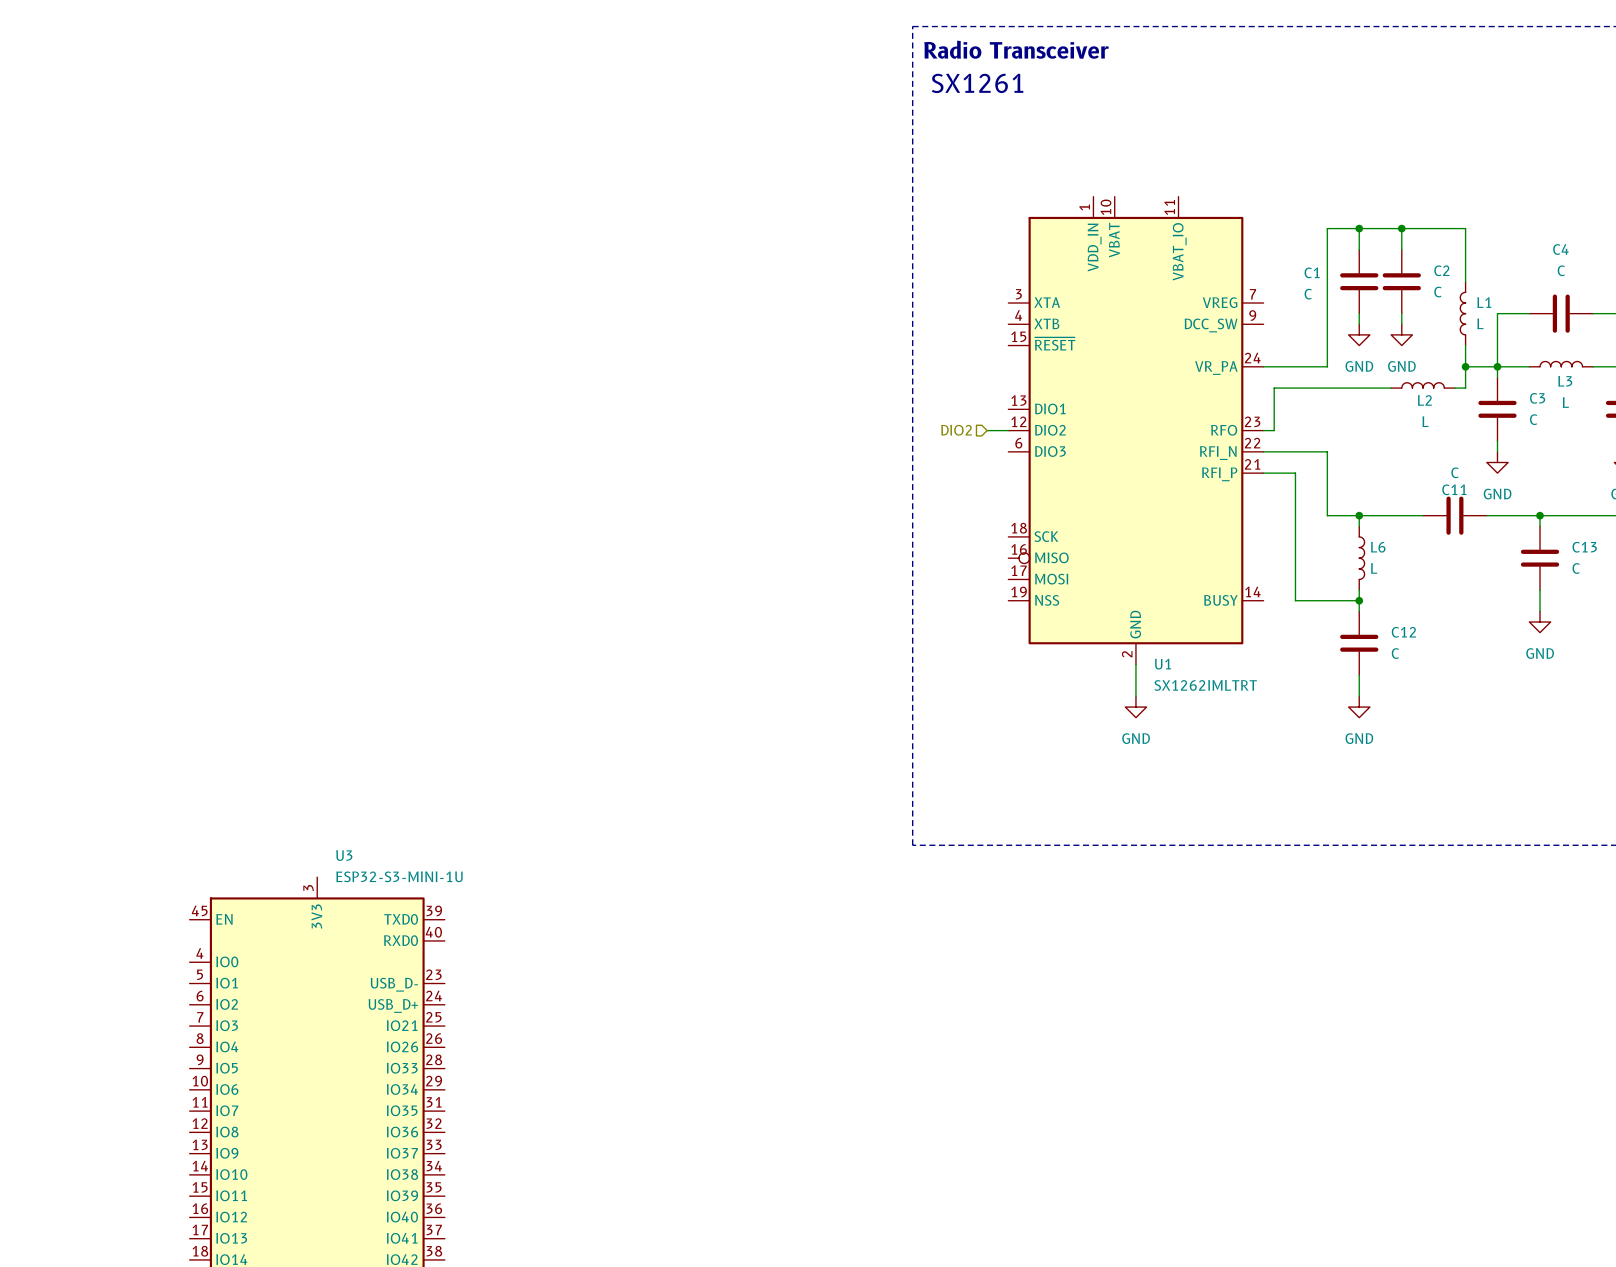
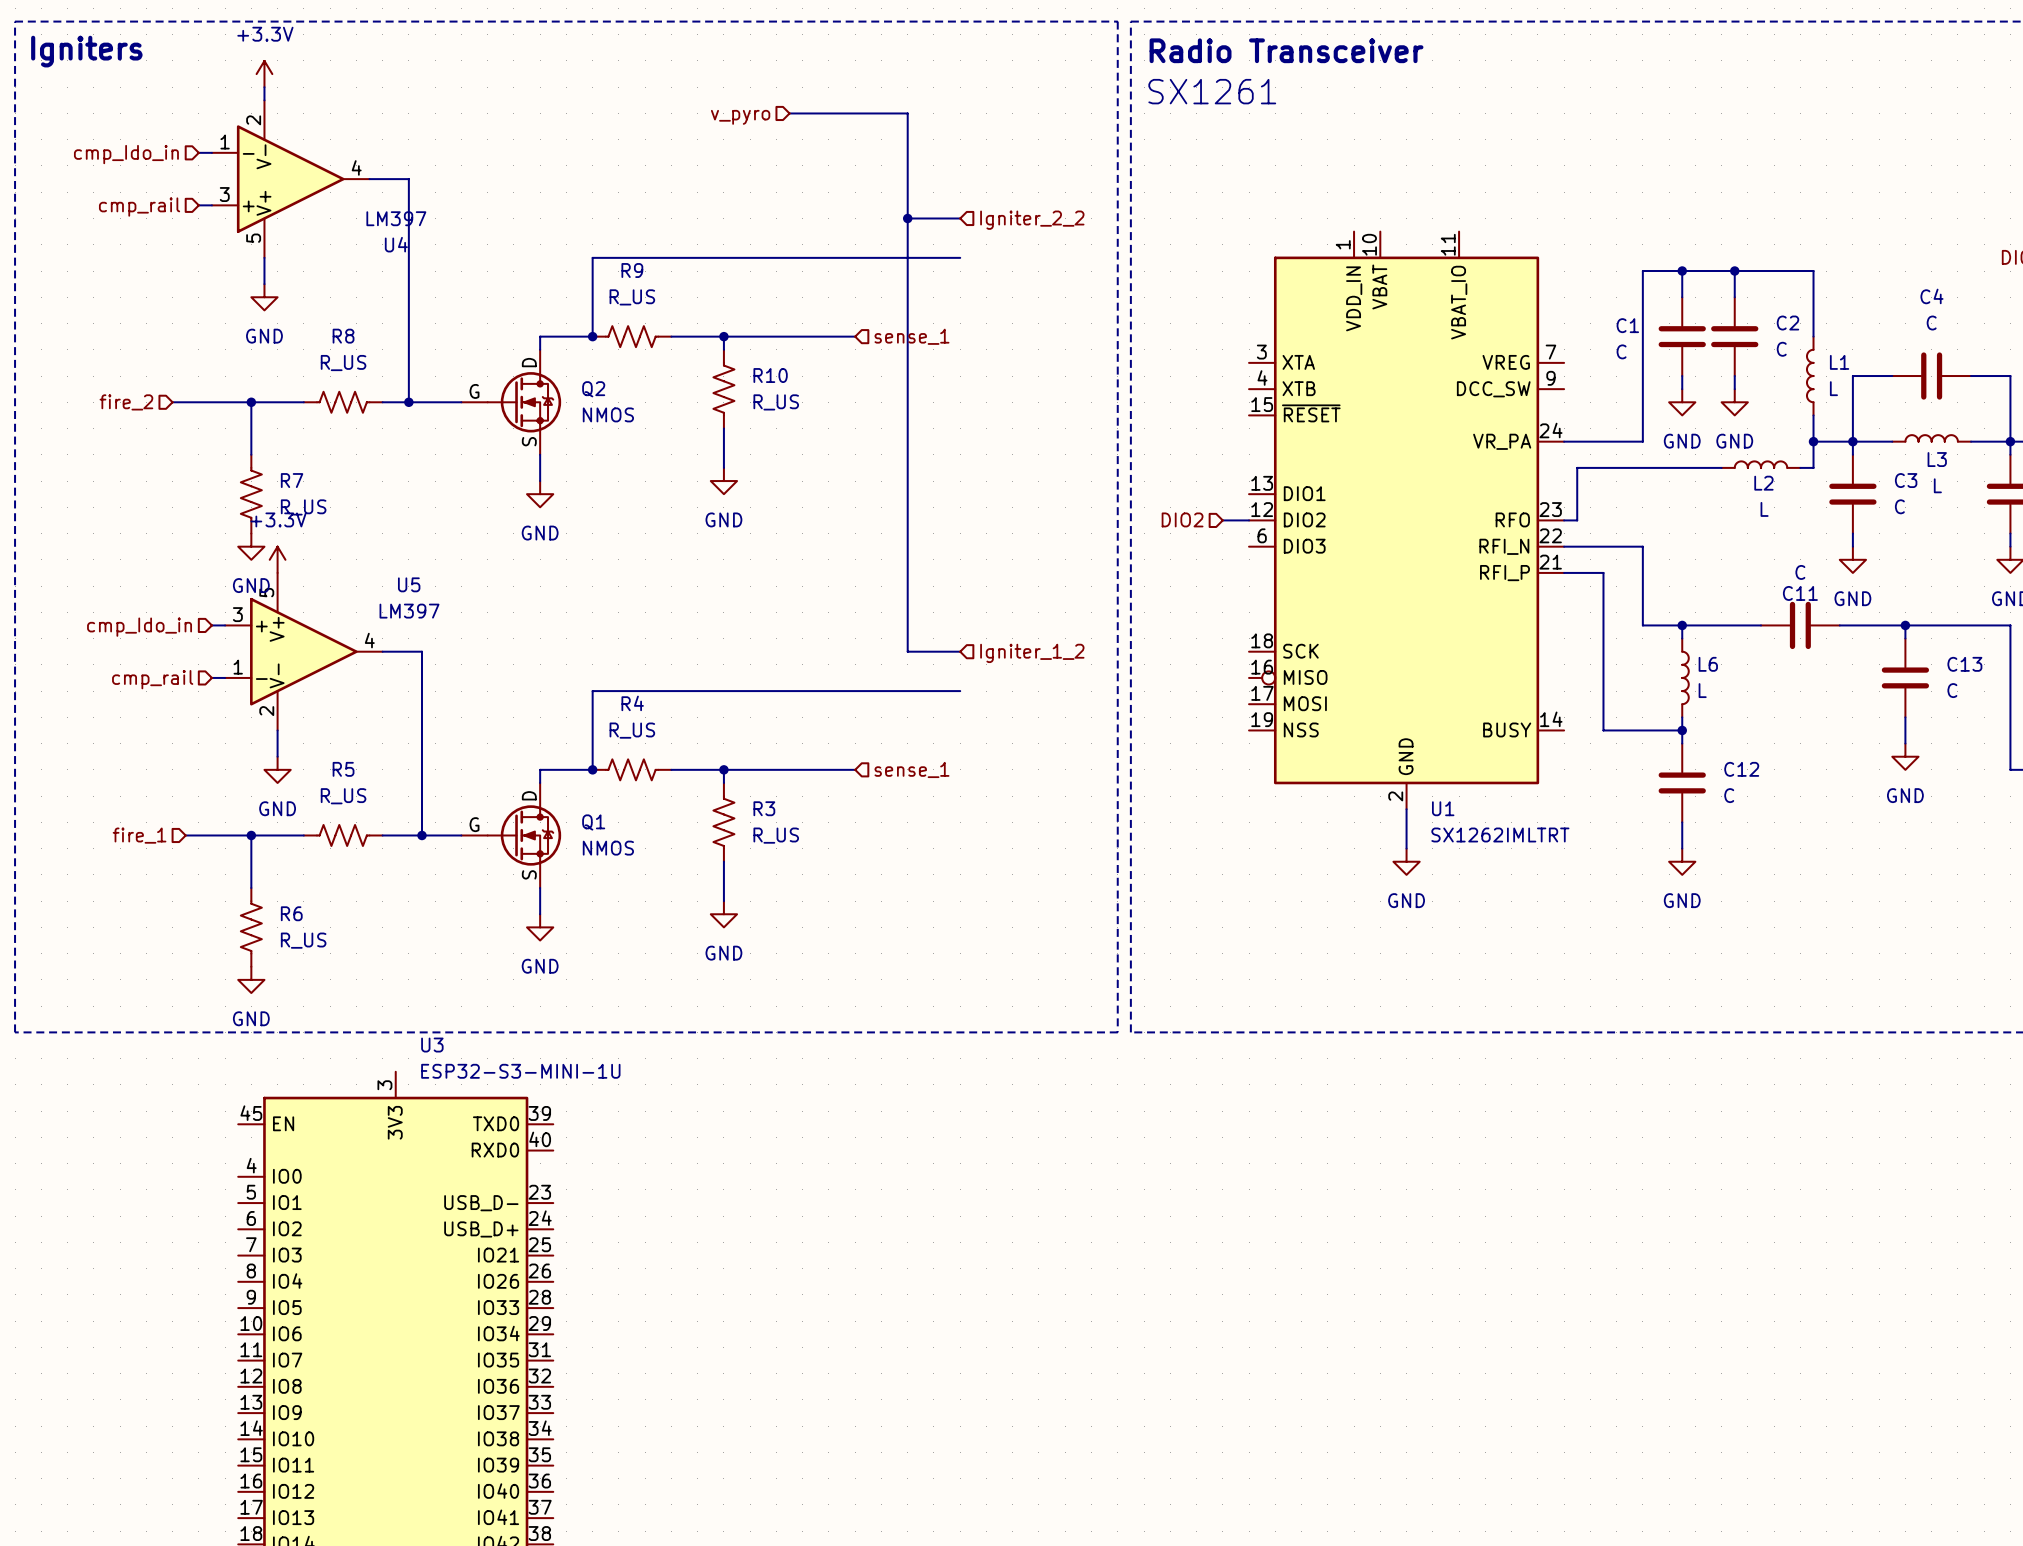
line: none -> (15, 21) (1117, 21) (1117, 1032) (15, 1032) (15, 21)
text: none -> Igniters (86, 51)
power symbol: none -> +3.3V (264, 74)
wire: none -> (264, 87) (264, 100)
wire: none -> (789, 113) (907, 113) (907, 651) (960, 651)
hierarchical label: none -> v_pyro (740, 117)
wire: none -> (198, 152) (211, 152)
hierarchical label: none -> cmp_Ido_in (126, 154)
U4: none -> LM397 (290, 179)
wire: none -> (369, 179) (408, 179) (408, 402)
wire: none -> (198, 205) (211, 205)
hierarchical label: none -> cmp_rail (139, 207)
wire: none -> (907, 218) (960, 218)
junction: none -> (907, 218)
hierarchical label: none -> Igniter_2_2 (1032, 220)
wire: none -> (264, 257) (264, 284)
wire: none -> (960, 257) (592, 257) (592, 336) (540, 336) (540, 349)
power symbol: none -> GND (264, 297)
junction: none -> (592, 336)
R9: none -> R_US (632, 336)
wire: none -> (671, 336) (855, 336)
wire: none -> (723, 336) (723, 349)
junction: none -> (723, 336)
hierarchical label: none -> sense_1 (911, 336)
R10: none -> R_US (723, 389)
wire: none -> (172, 402) (303, 402)
wire: none -> (251, 402) (251, 454)
junction: none -> (251, 402)
R8: none -> R_US (343, 402)
wire: none -> (382, 402) (461, 402)
junction: none -> (408, 402)
Q2: none -> NMOS (511, 402)
hierarchical label: none -> fire_2 (126, 402)
wire: none -> (723, 428) (723, 467)
wire: none -> (540, 454) (540, 481)
power symbol: none -> GND (723, 481)
R7: none -> R_US (251, 494)
power symbol: none -> GND (540, 494)
power symbol: none -> GND (251, 546)
power symbol: none -> +3.3V (277, 559)
wire: none -> (211, 625) (225, 625)
hierarchical label: none -> cmp_Ido_in (139, 627)
U5: none -> LM397 (303, 651)
wire: none -> (382, 651) (421, 651) (421, 835)
hierarchical label: none -> Igniter_1_2 (1032, 653)
wire: none -> (211, 677) (225, 677)
hierarchical label: none -> cmp_rail (152, 679)
wire: none -> (960, 691) (592, 691) (592, 769) (540, 769) (540, 782)
wire: none -> (277, 730) (277, 756)
power symbol: none -> GND (277, 769)
junction: none -> (592, 769)
R4: none -> R_US (632, 769)
wire: none -> (671, 769) (855, 769)
wire: none -> (723, 769) (723, 782)
junction: none -> (723, 769)
hierarchical label: none -> sense_1 (911, 769)
R3: none -> R_US (723, 822)
wire: none -> (185, 835) (303, 835)
wire: none -> (251, 835) (251, 887)
junction: none -> (251, 835)
R5: none -> R_US (343, 835)
wire: none -> (382, 835) (461, 835)
junction: none -> (421, 835)
Q1: none -> NMOS (511, 835)
hierarchical label: none -> fire_1 (139, 835)
wire: none -> (723, 861) (723, 901)
wire: none -> (540, 887) (540, 914)
power symbol: none -> GND (723, 914)
R6: none -> R_US (251, 927)
power symbol: none -> GND (540, 927)
power symbol: none -> GND (251, 979)

